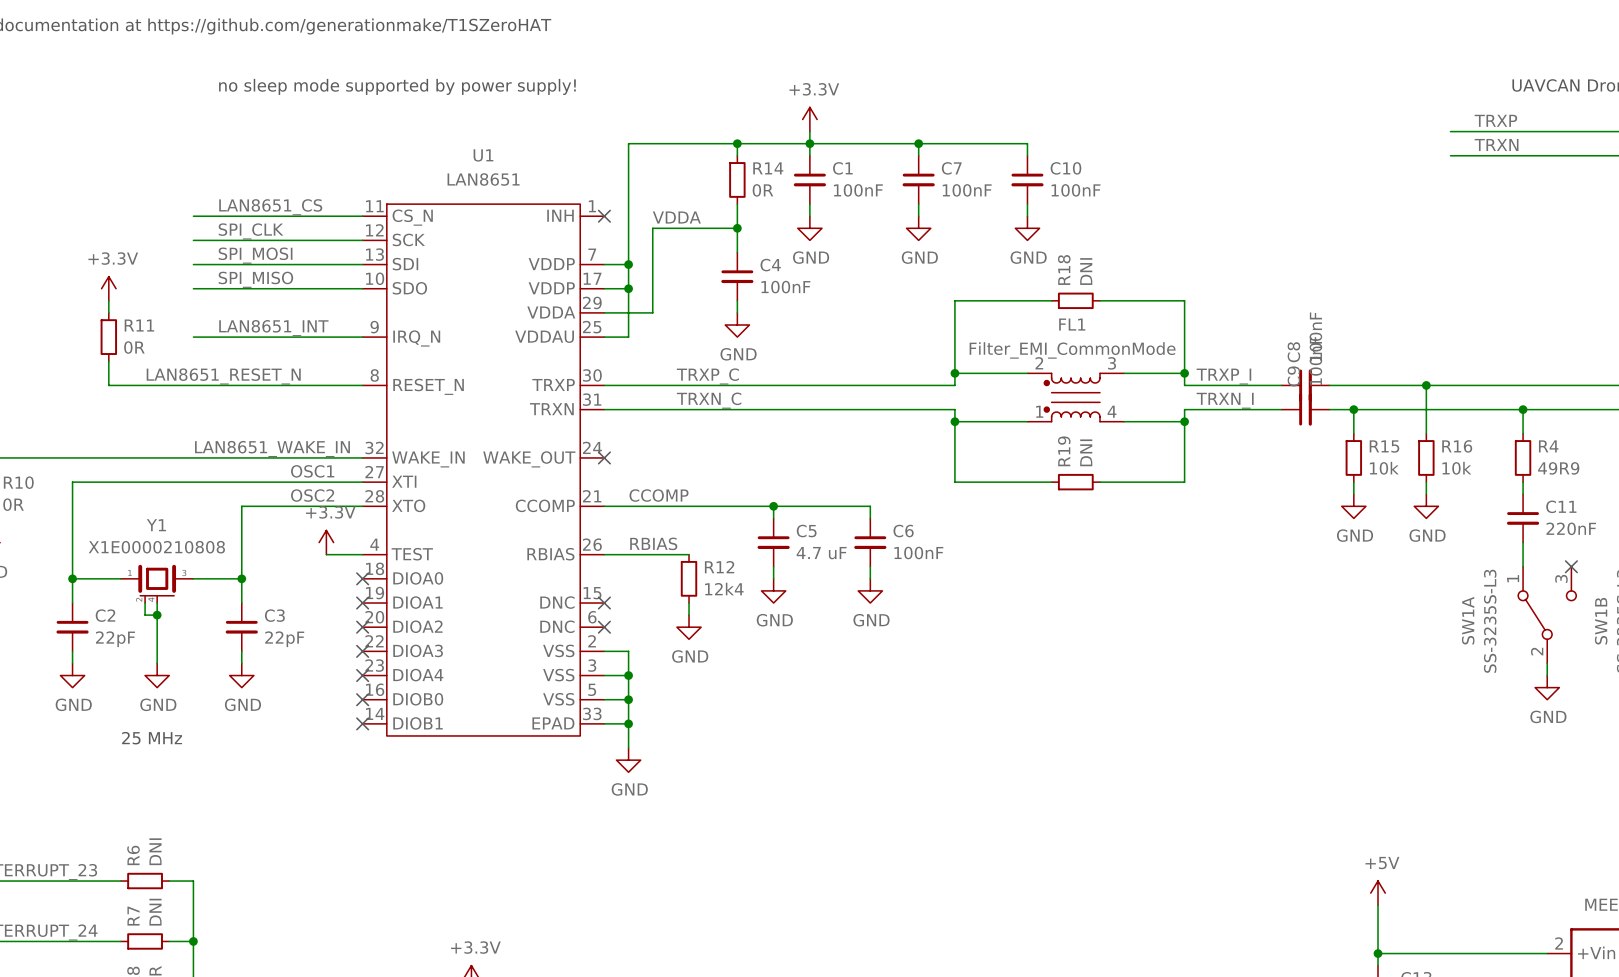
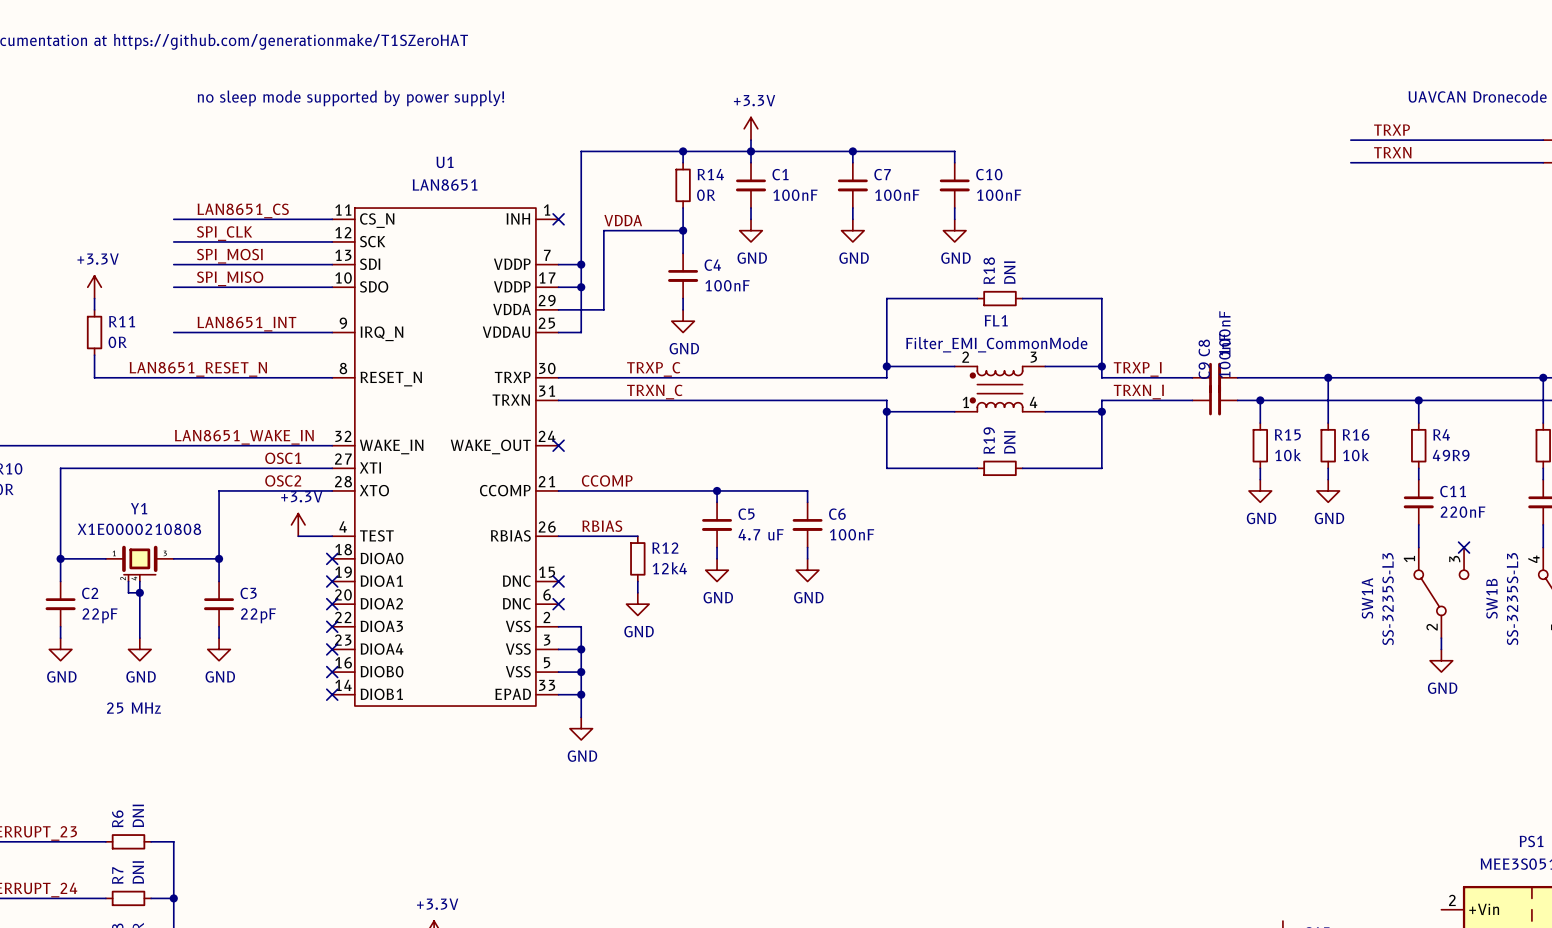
power symbol: +5V (1378, 893) -> none
wire: (1378, 905) (1378, 965) -> none
wire: (1378, 953) (1547, 953) -> none
junction: (1378, 953) -> none

